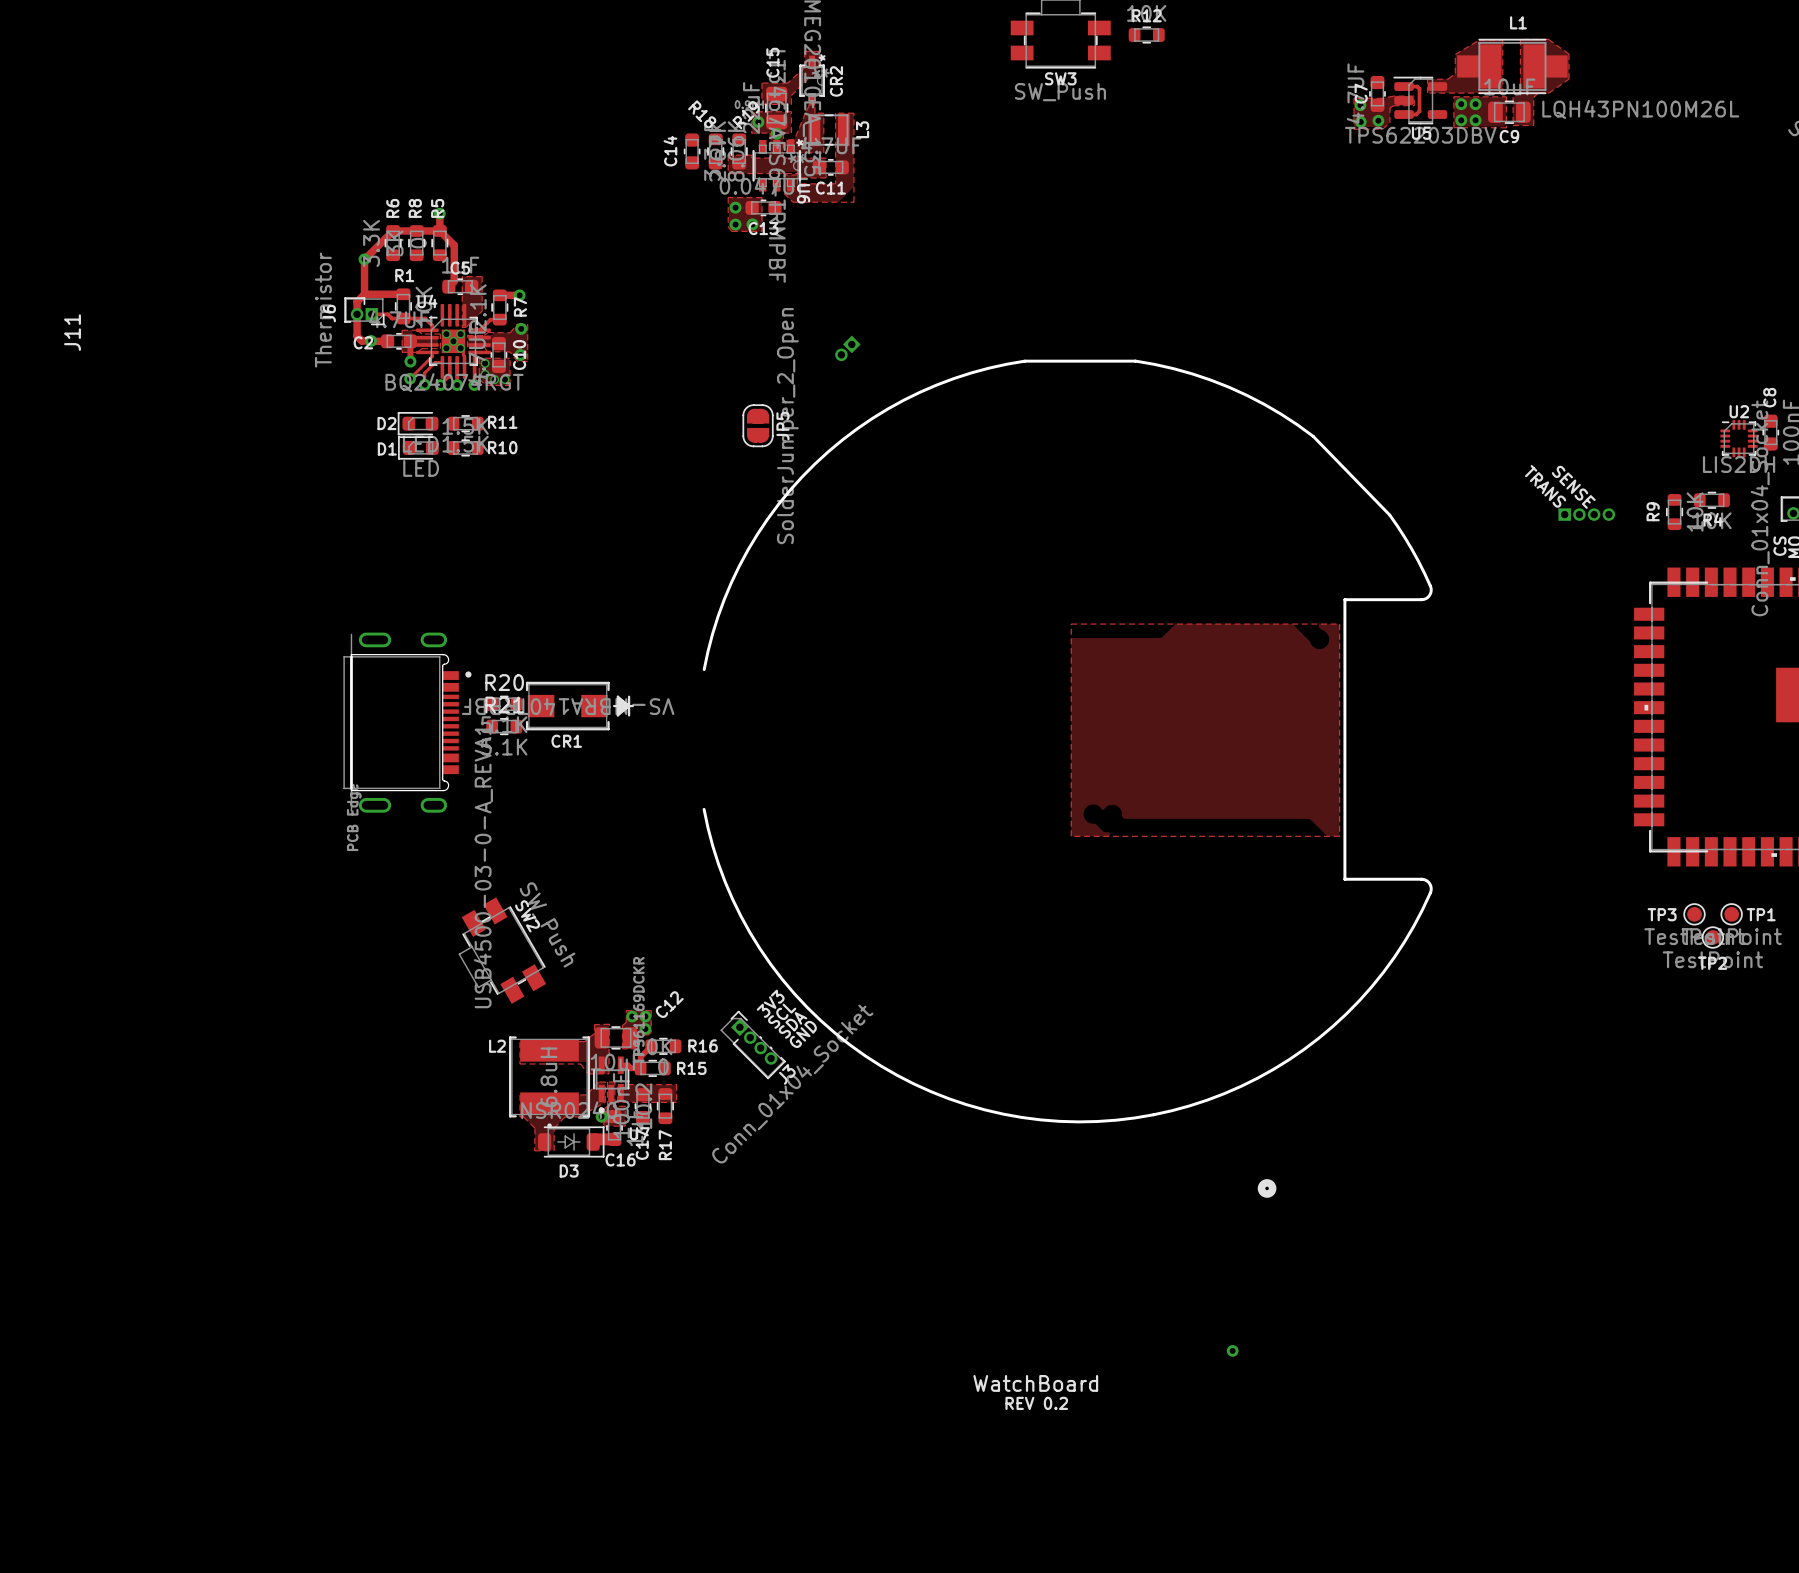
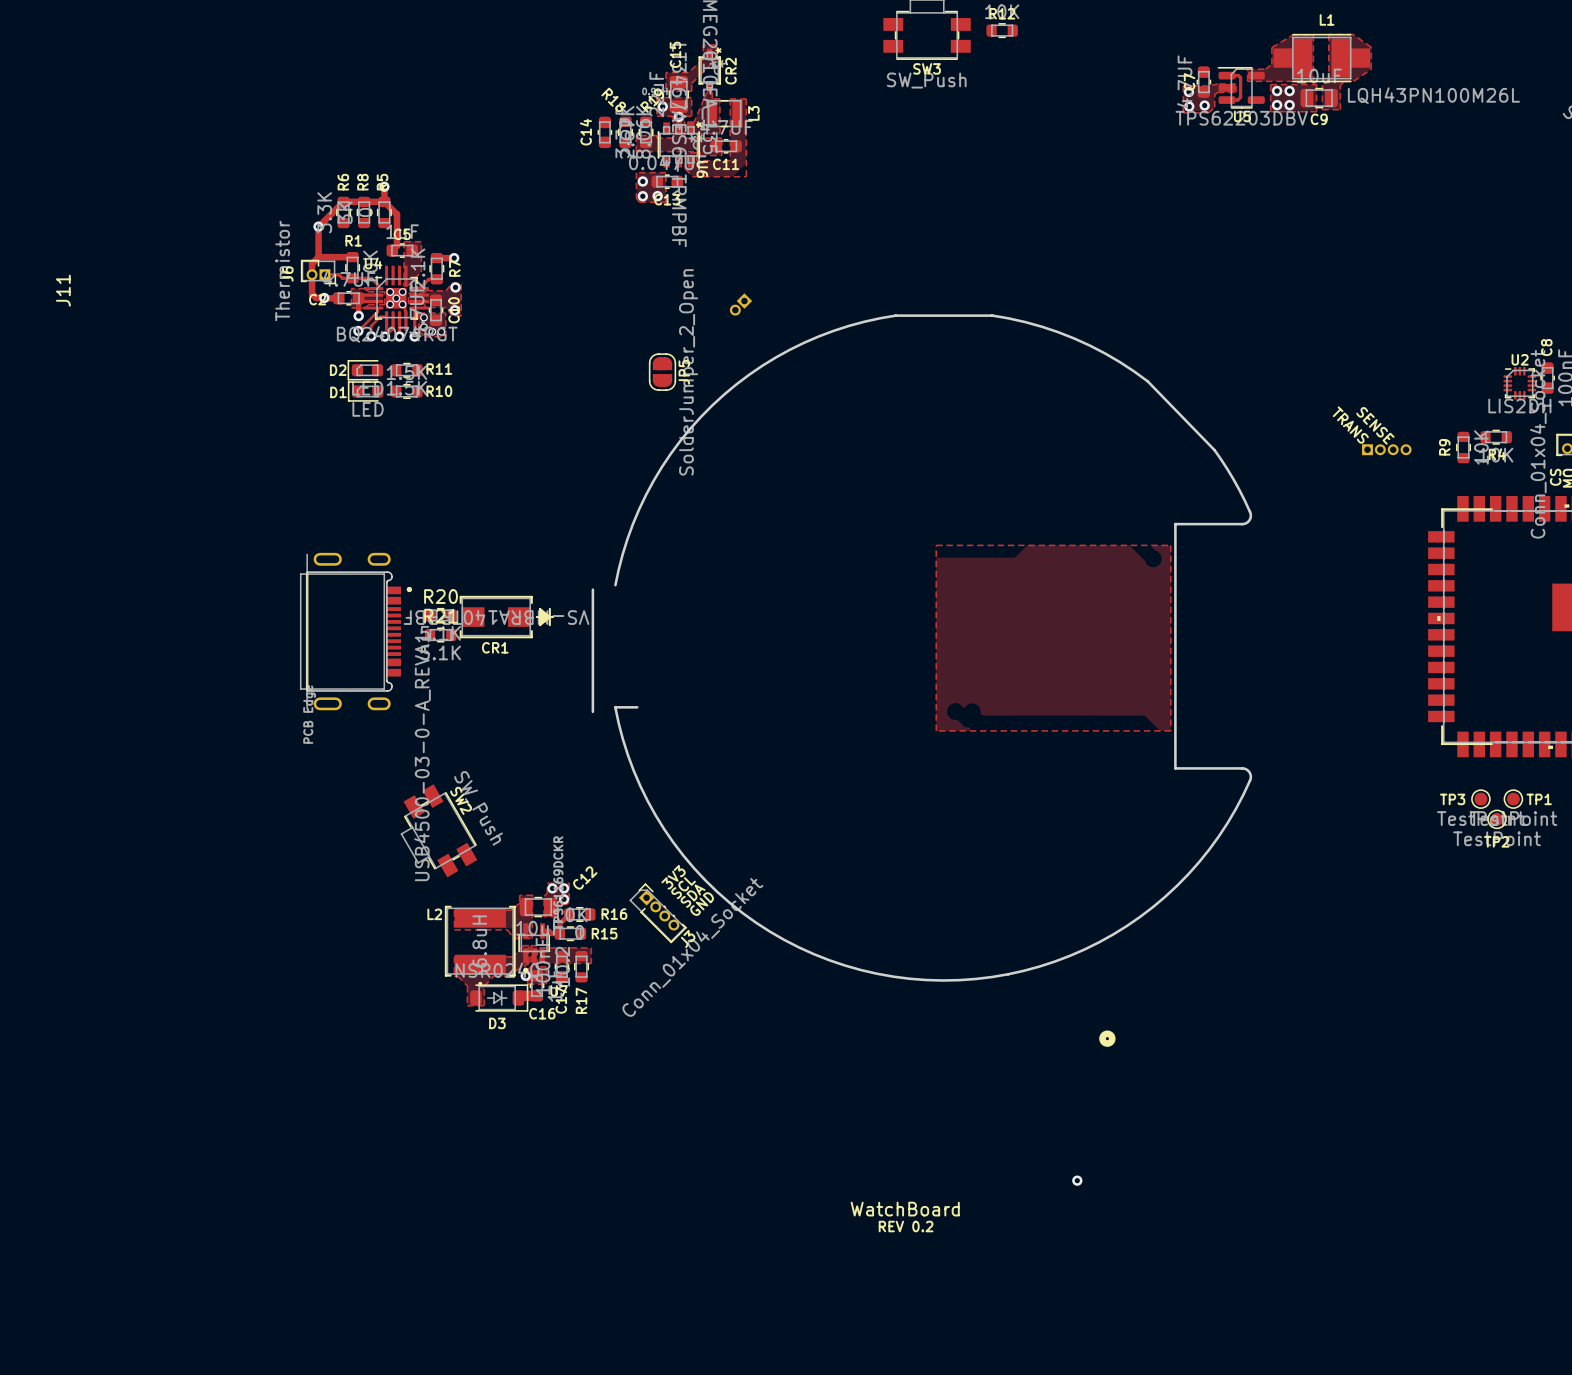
board edge: none -> (592, 589) (592, 711)
board edge: none -> (615, 707) (637, 707)

